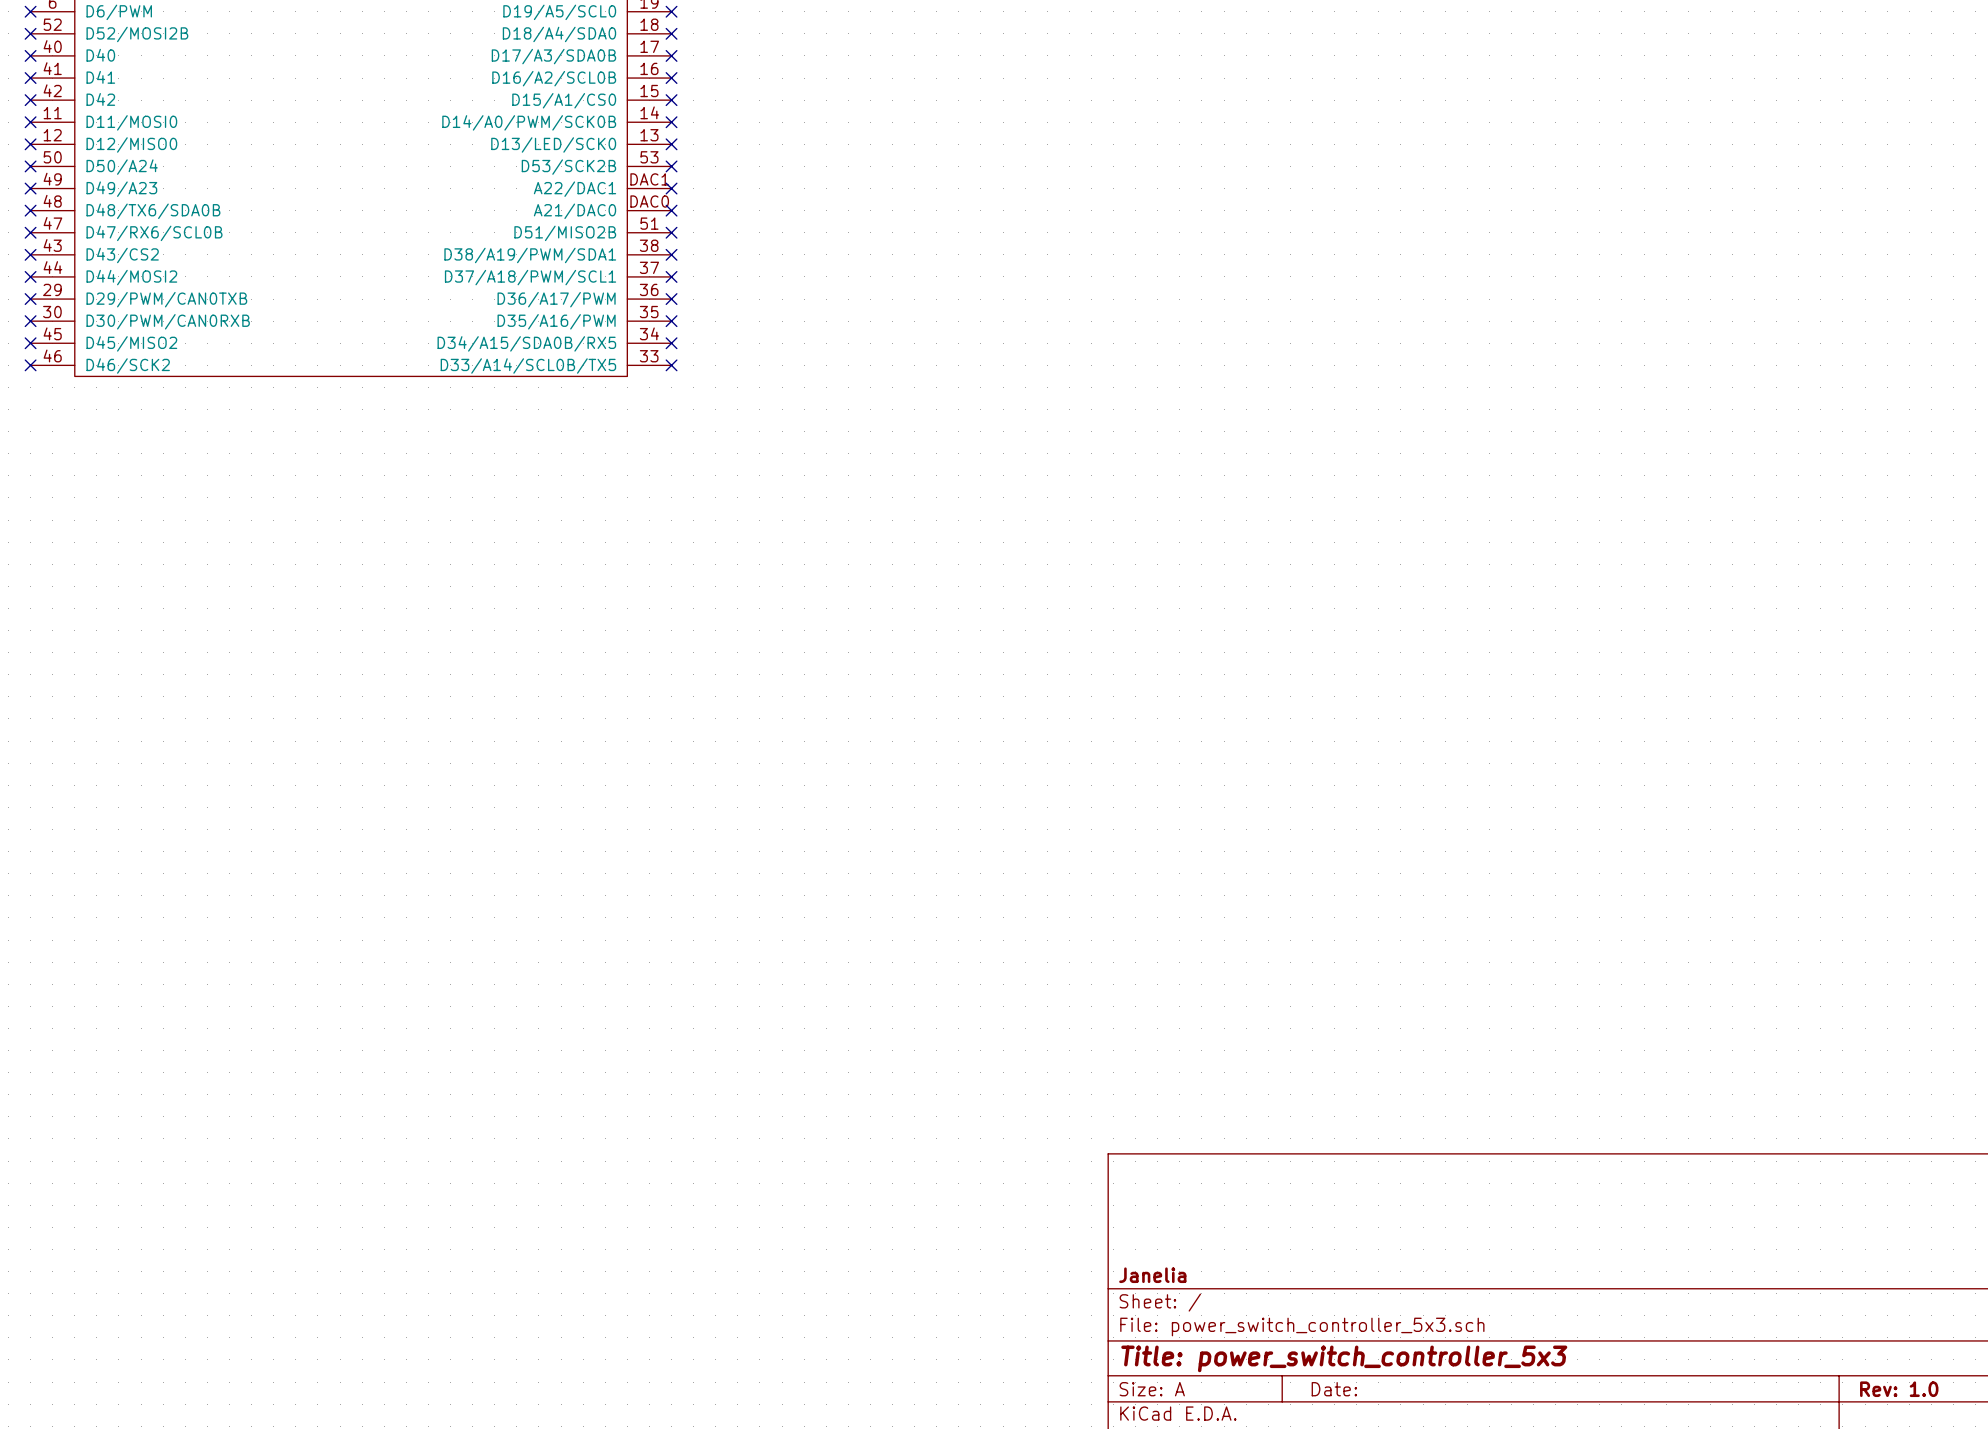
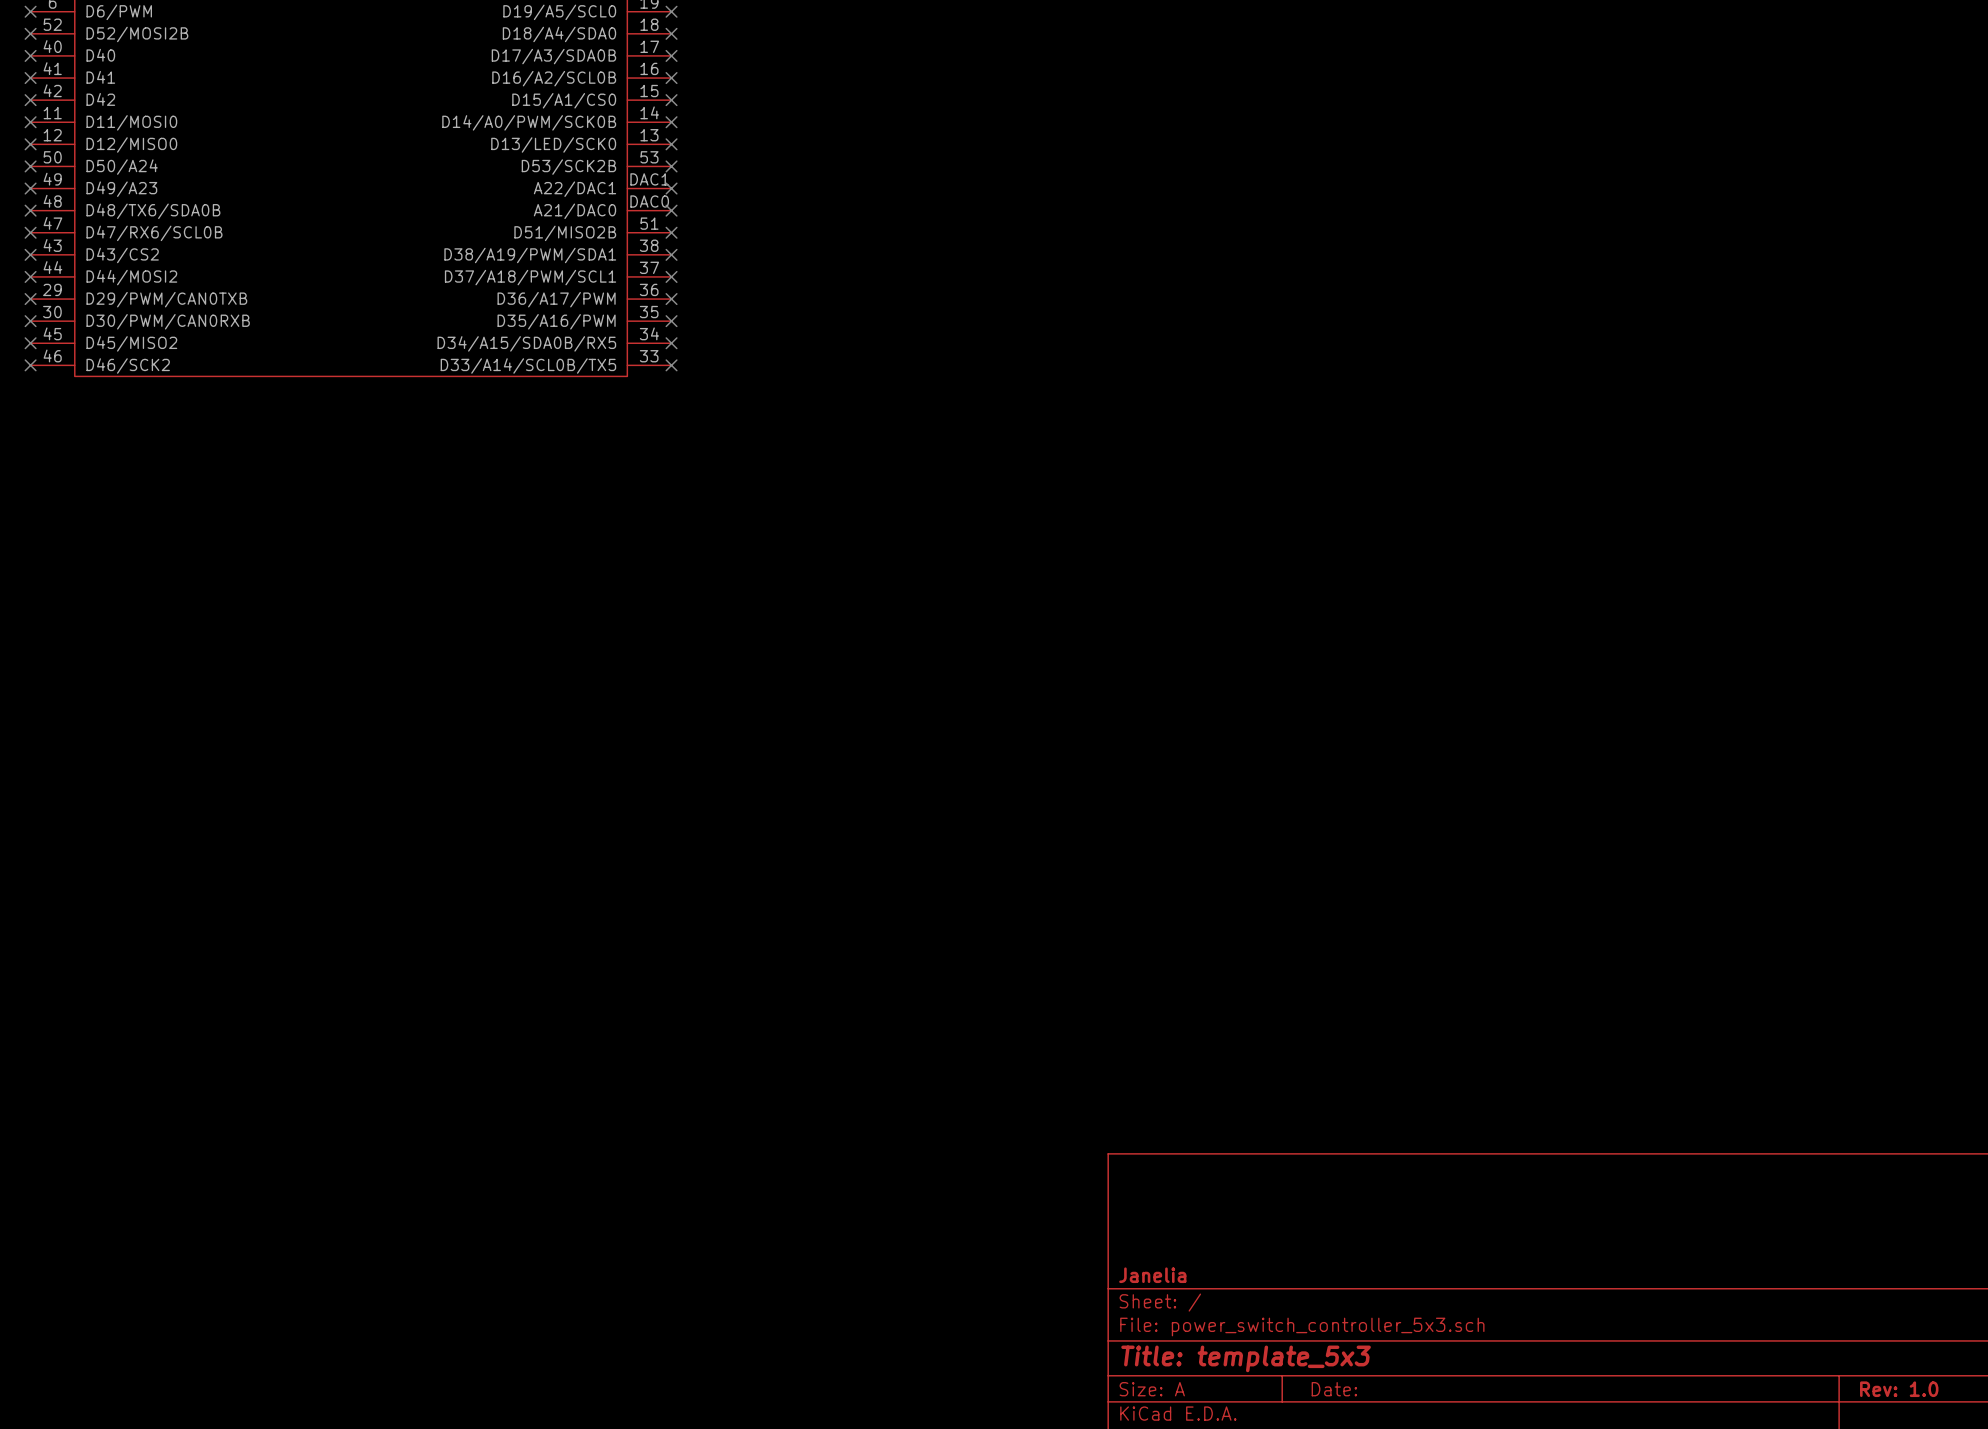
title block: Title: power_switch_controller_5x3 (1344, 1358) -> Title: template_5x3 (1246, 1358)

